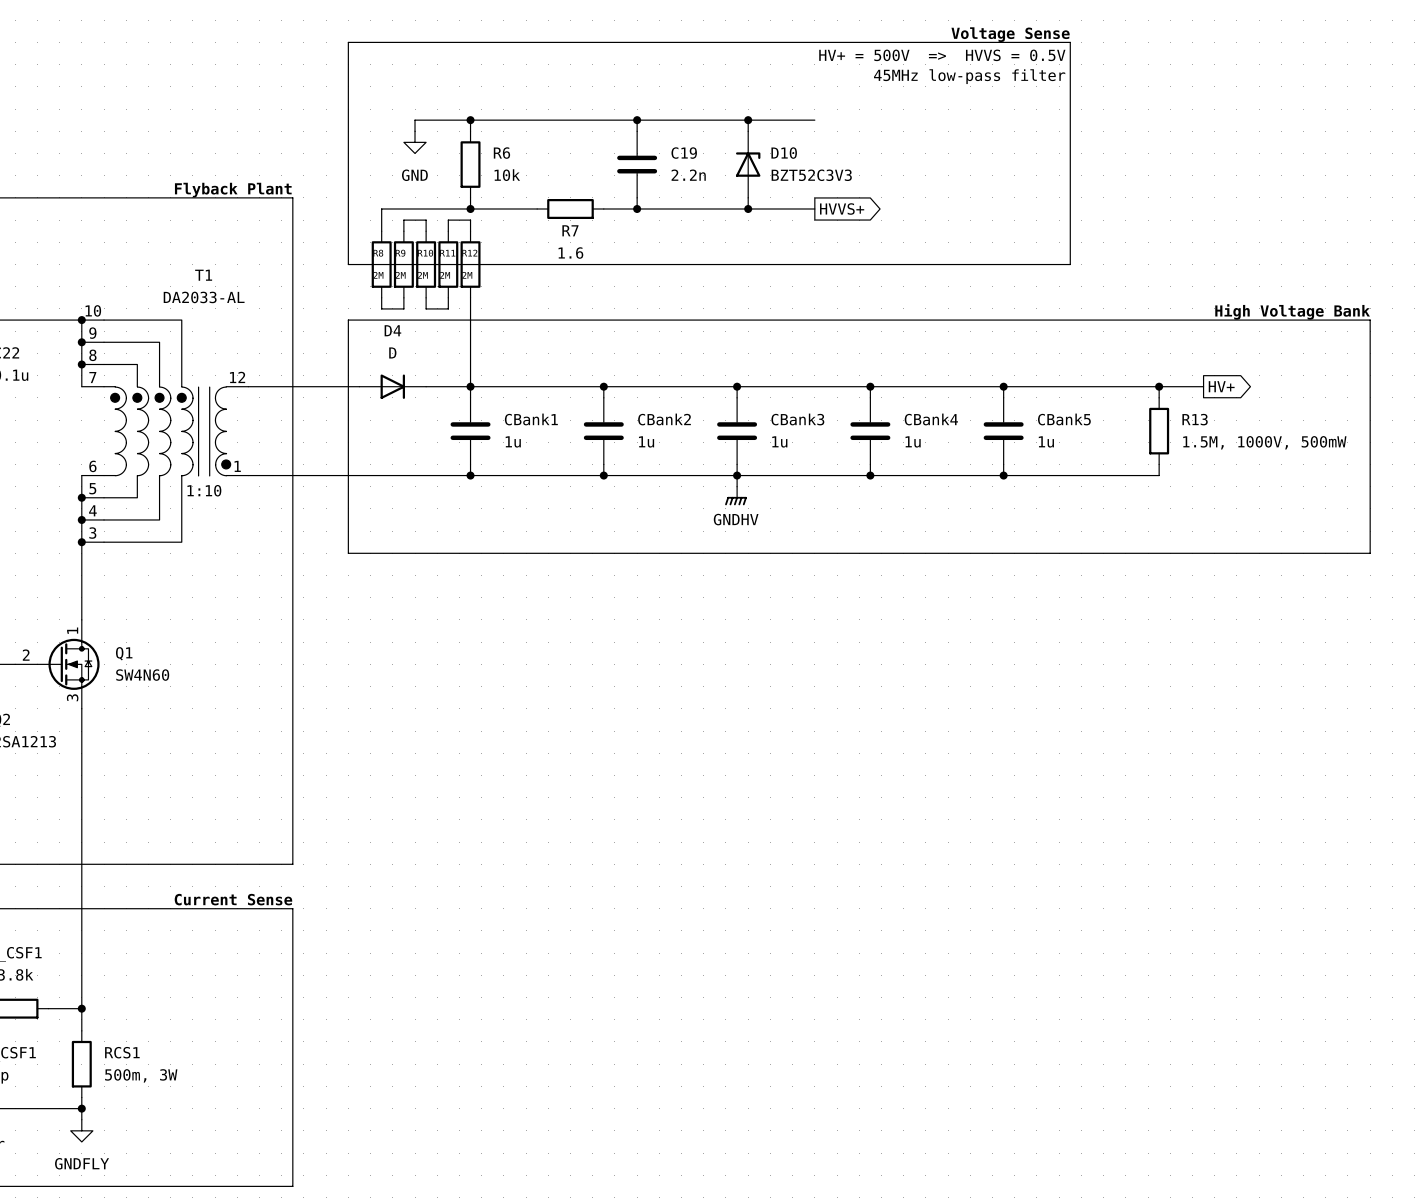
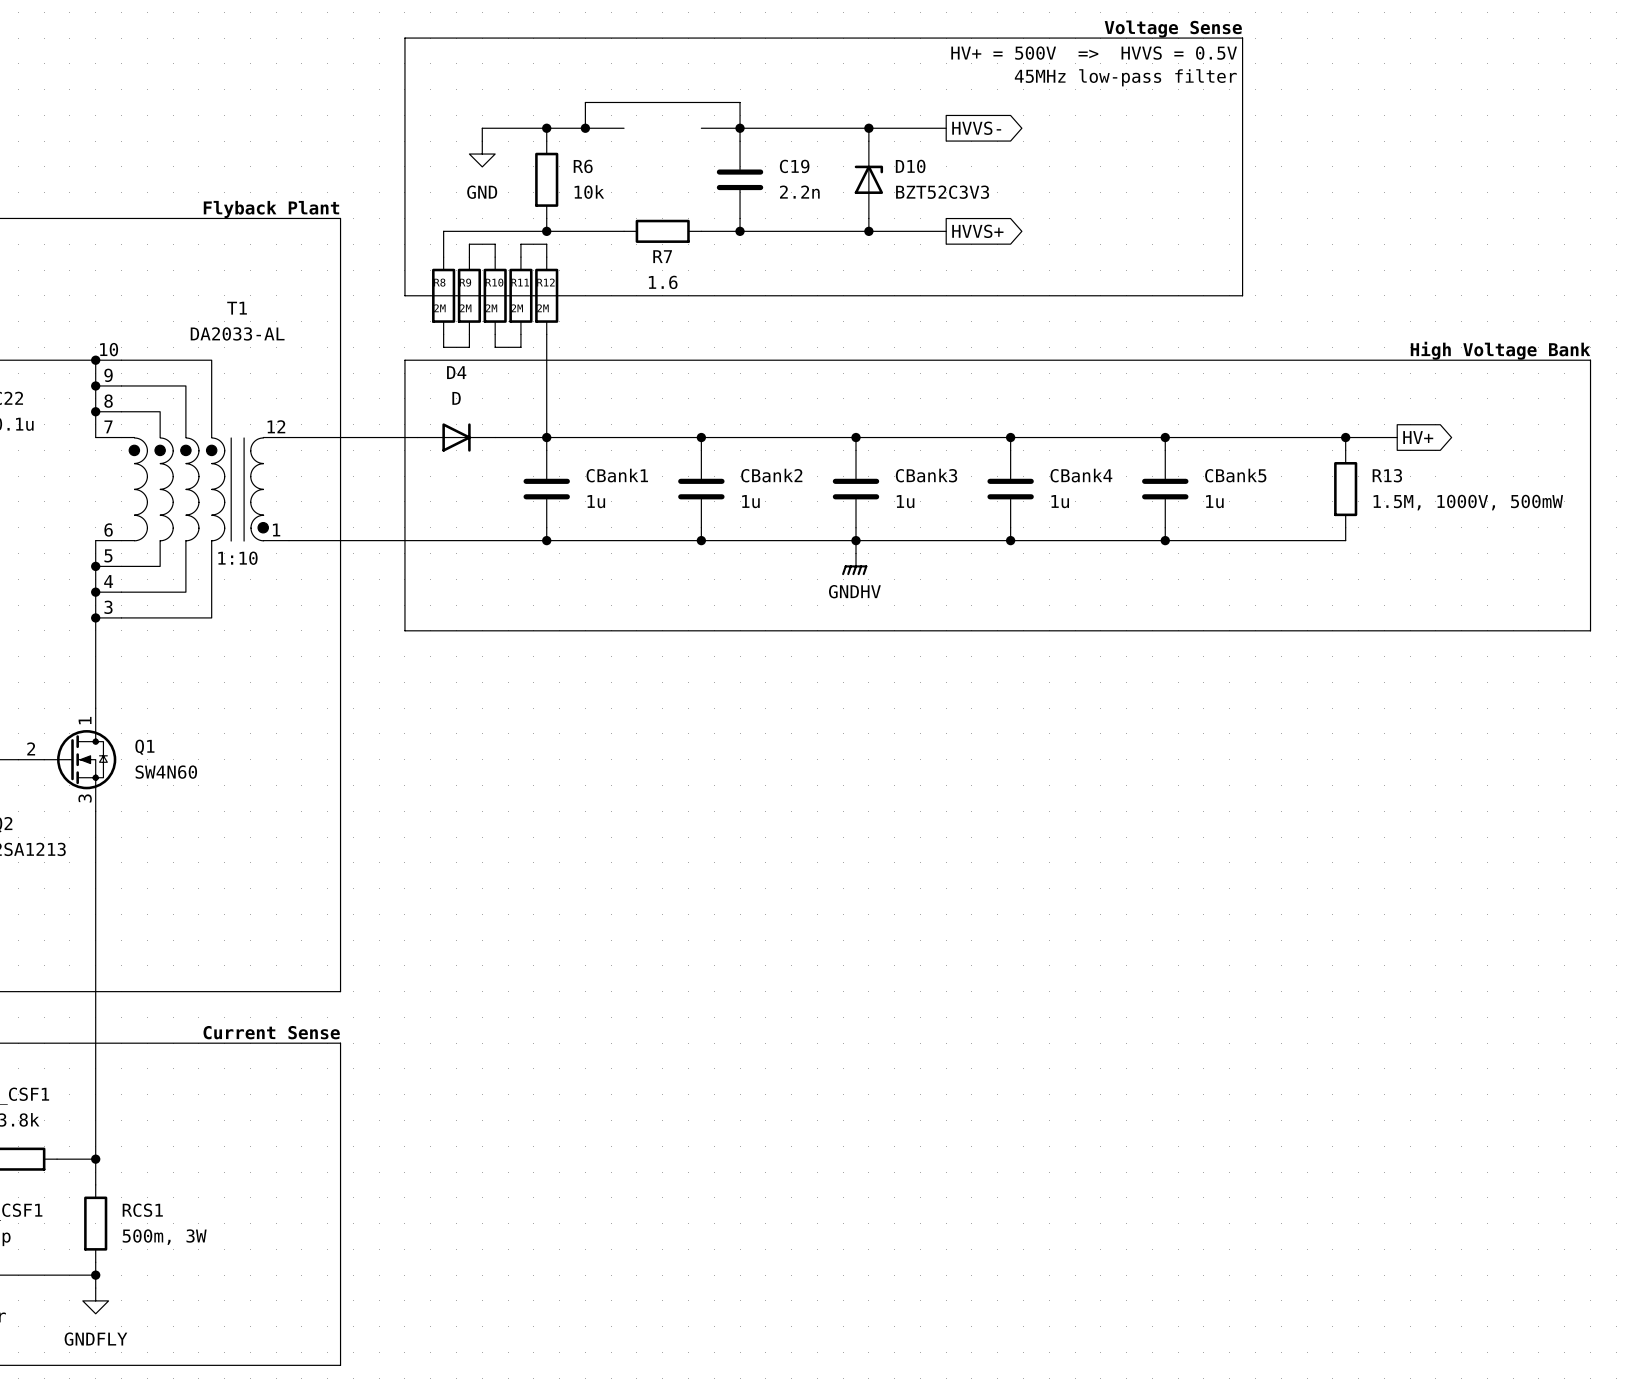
wire: none -> (585, 128) (585, 102) (740, 102) (740, 128)
junction: none -> (585, 128)
wire: (537, 120) (603, 120) -> none
global label: none -> HVVS- (976, 128)

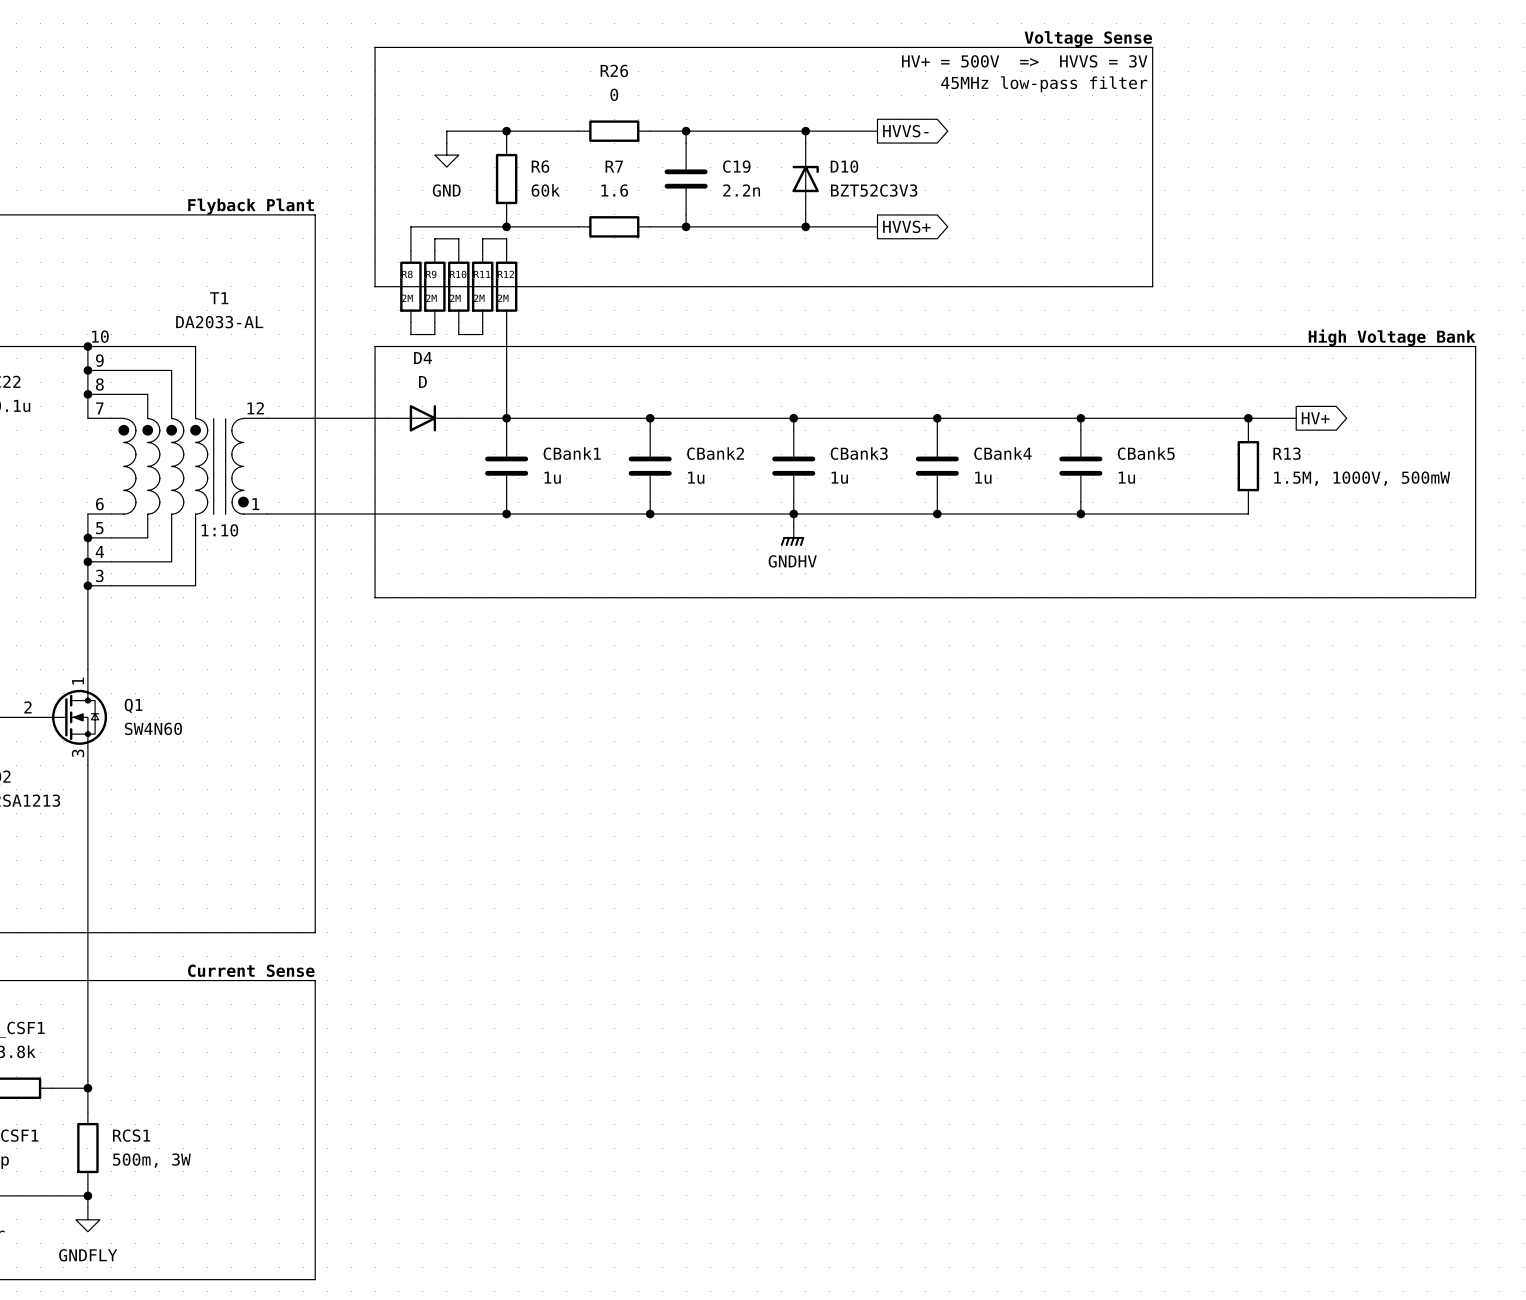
text: HV+ = 500V => HVVS = 0.5V (1094, 53) -> HV+ = 500V => HVVS = 3V (1024, 61)
wire: (585, 128) (585, 102) (740, 102) (740, 128) -> none
junction: (585, 128) -> none
R26: none -> 0 (614, 131)
R6 value: 10k (589, 192) -> 60k (545, 190)
R7 name position: R7 (662, 256) -> R7 (614, 166)
R7 value position: 1.6 (663, 282) -> 1.6 (614, 190)

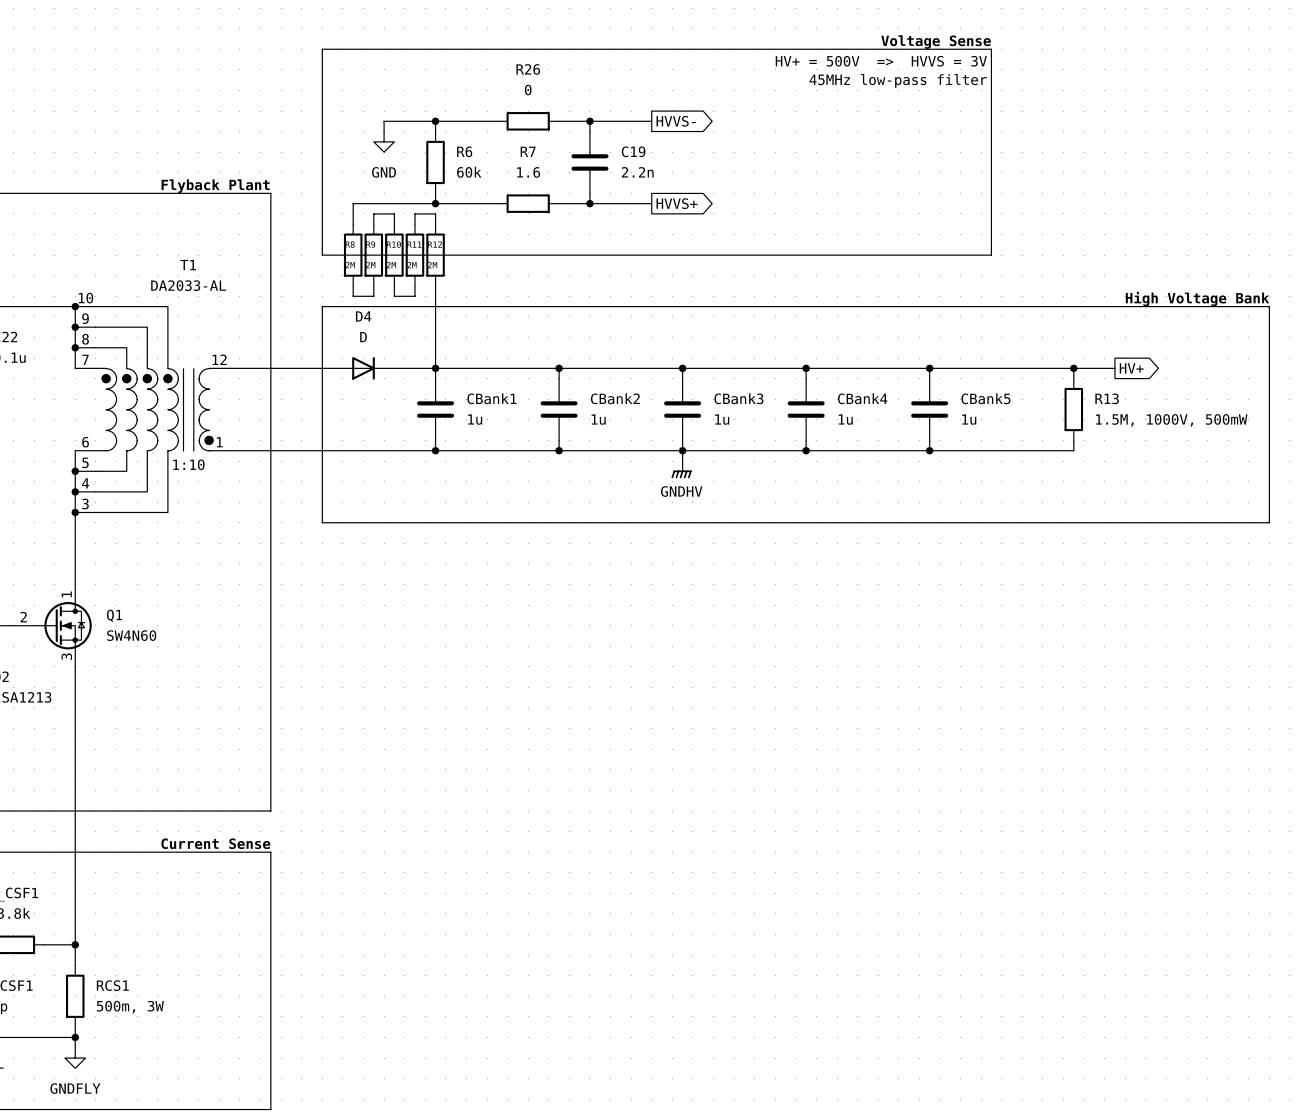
wire: (757, 131) (877, 131) -> none
wire: (805, 131) (805, 143) -> none
junction: (805, 131) -> none
global label position: HVVS- (905, 131) -> HVVS- (676, 121)
D10: BZT52C3V3 (805, 179) -> none
wire: (805, 214) (805, 226) -> none
wire: (757, 226) (877, 226) -> none
junction: (805, 226) -> none
global label position: HVVS+ (906, 226) -> HVVS+ (677, 203)

